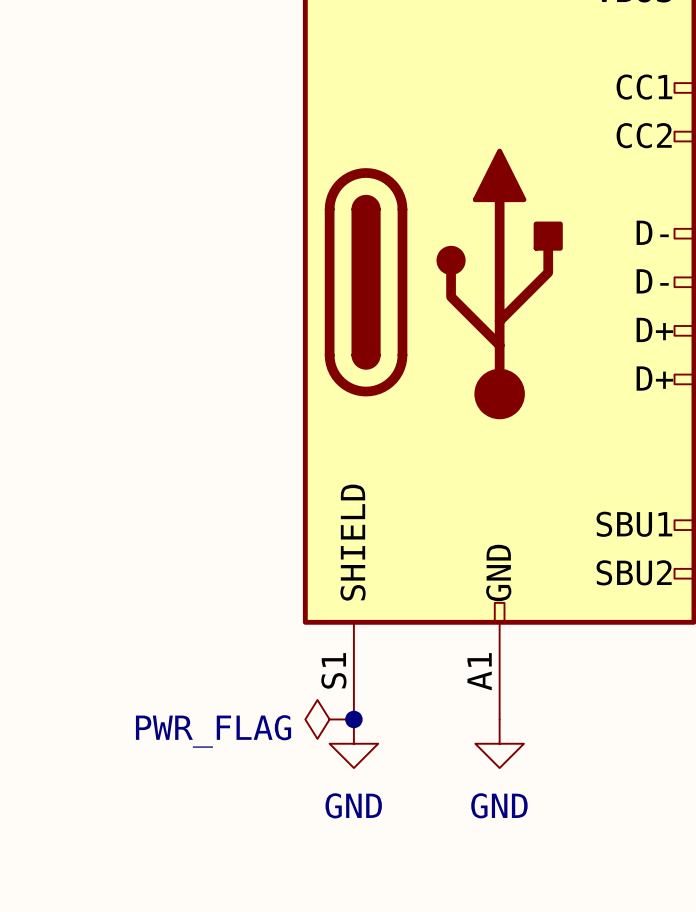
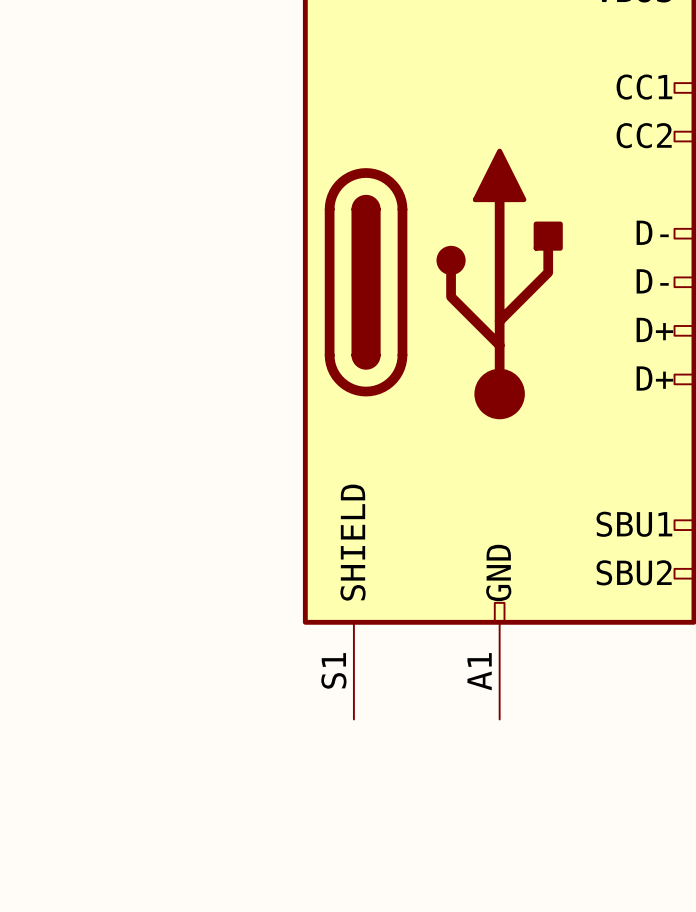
power symbol: PWR_FLAG (329, 719) -> none
junction: (353, 719) -> none
power symbol: GND (353, 743) -> none
power symbol: GND (499, 743) -> none

